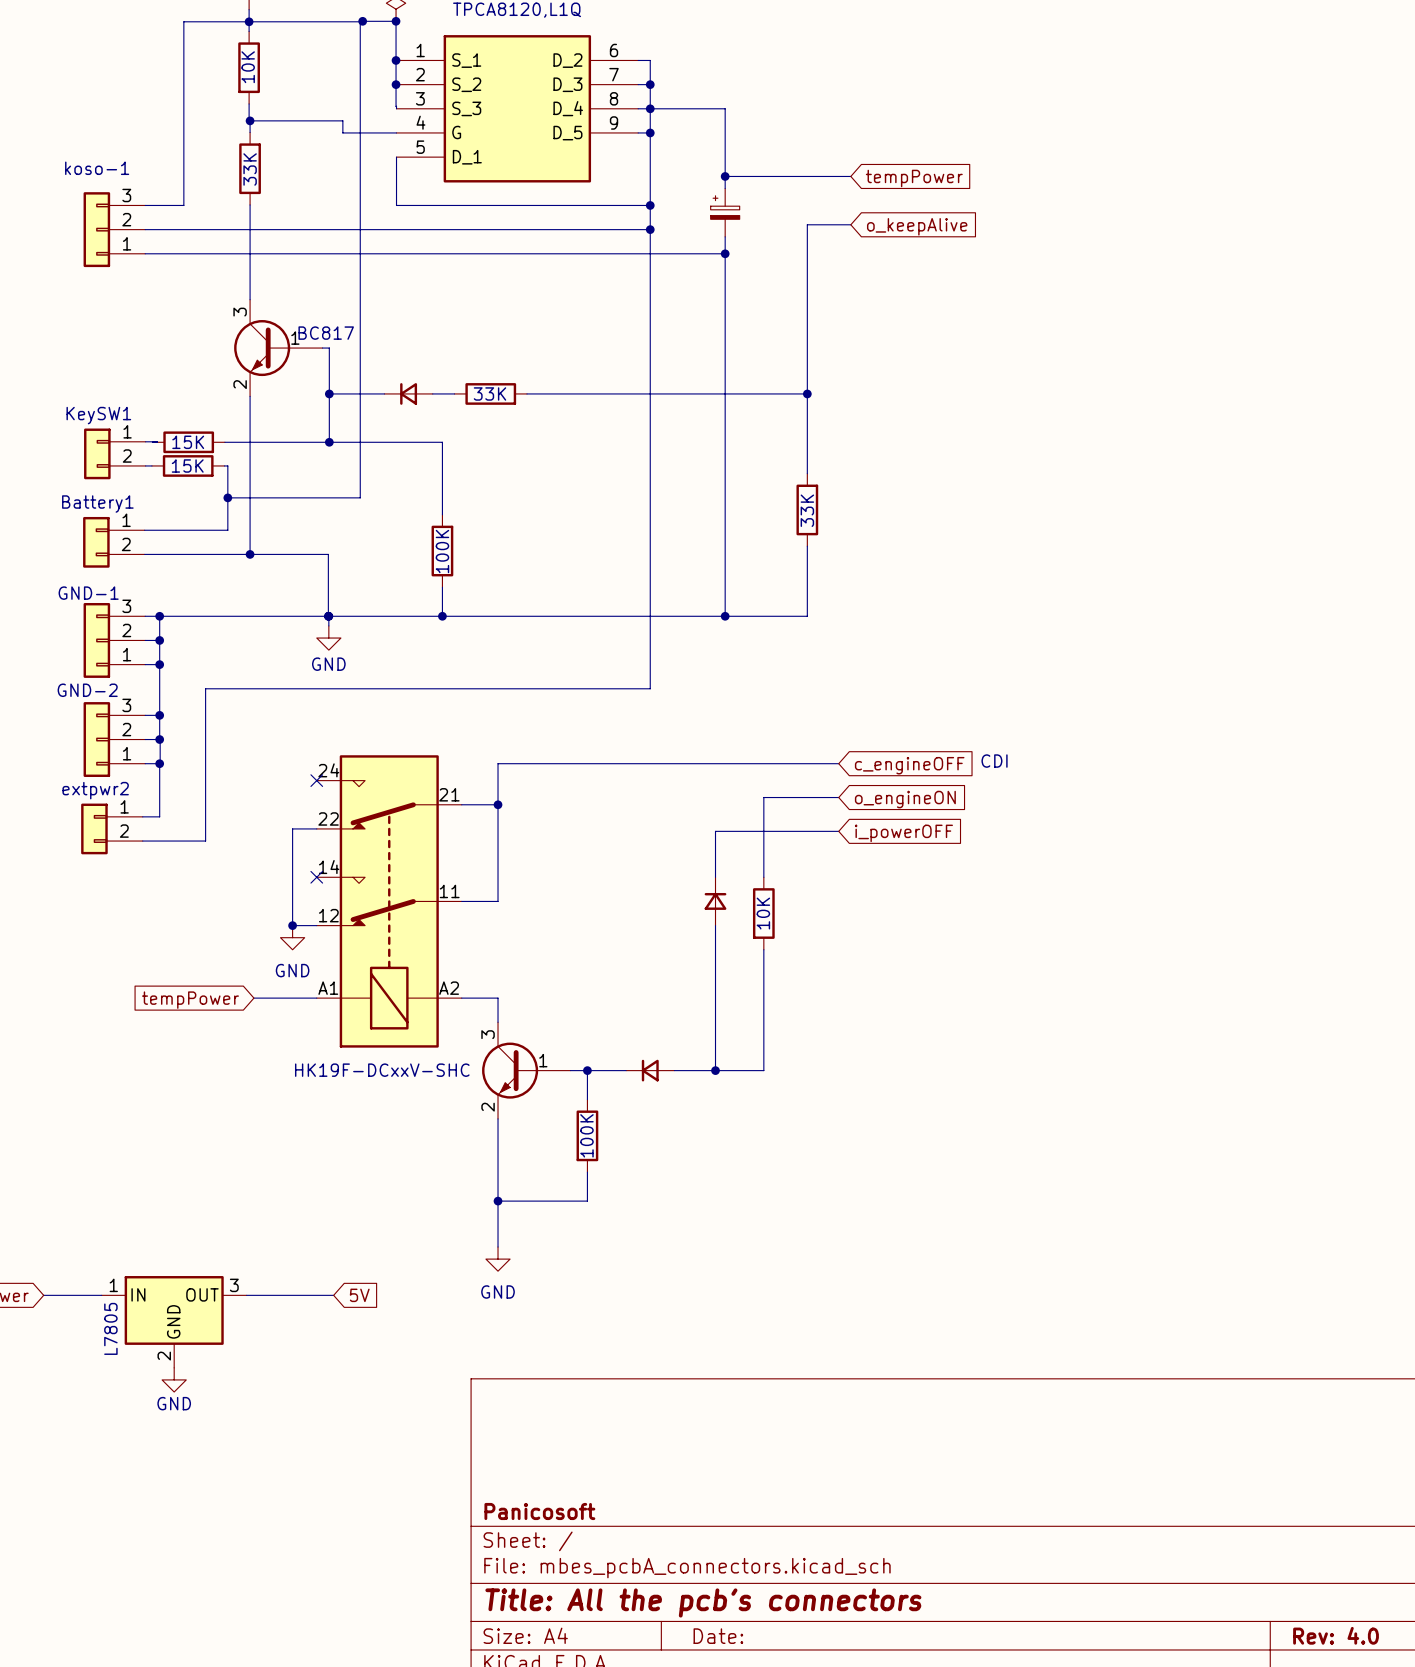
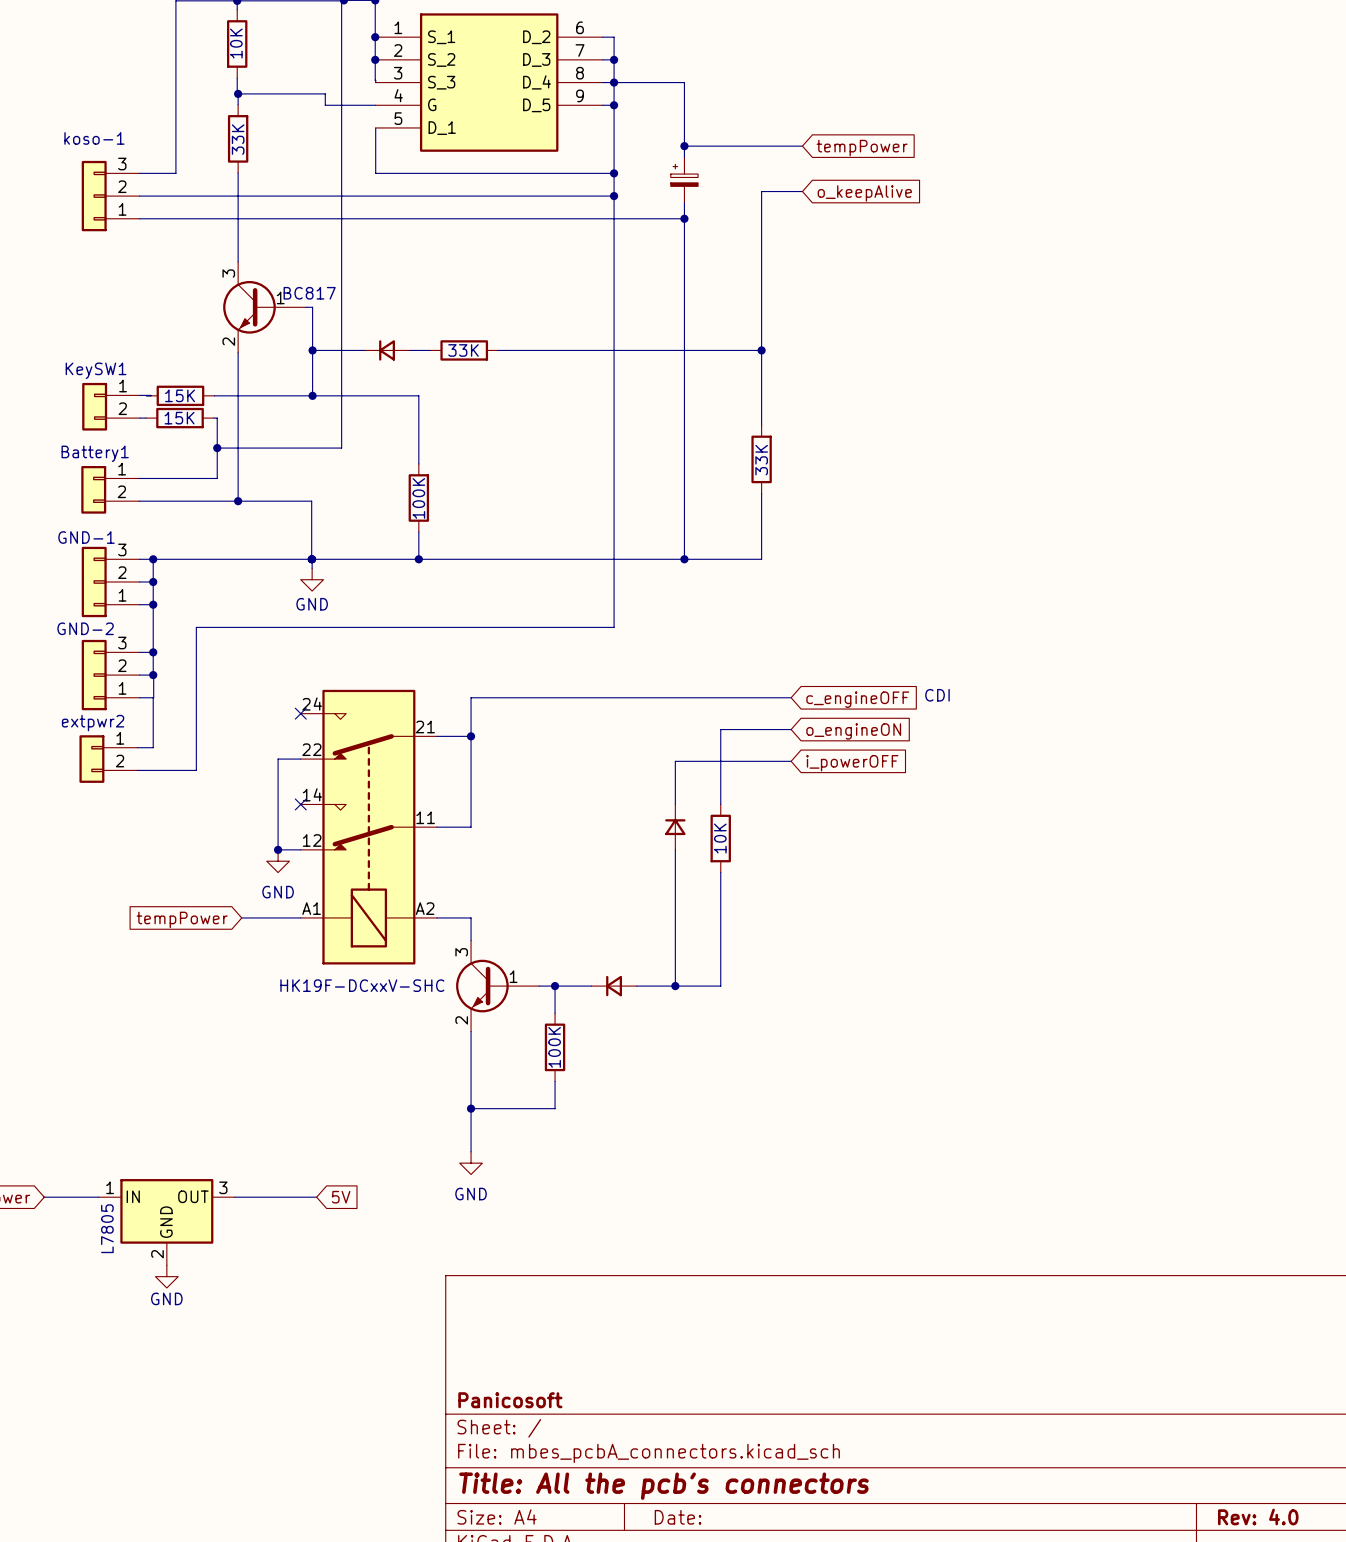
junction: (159, 763) -> none

